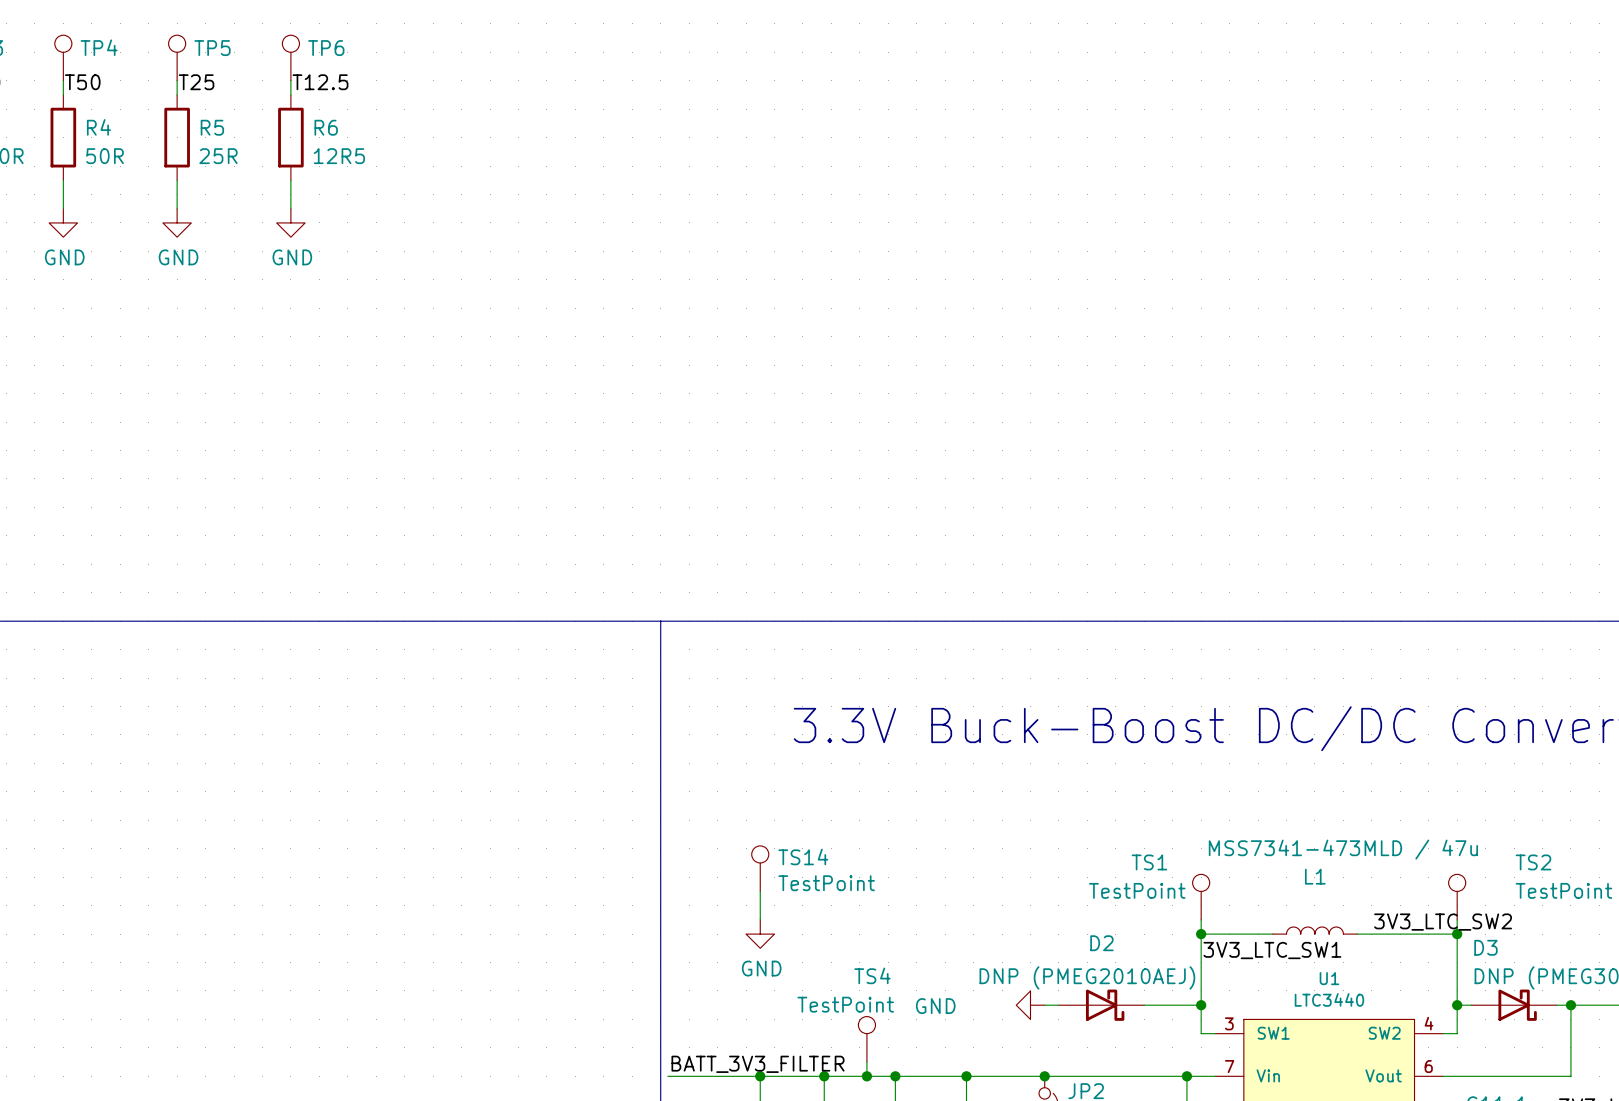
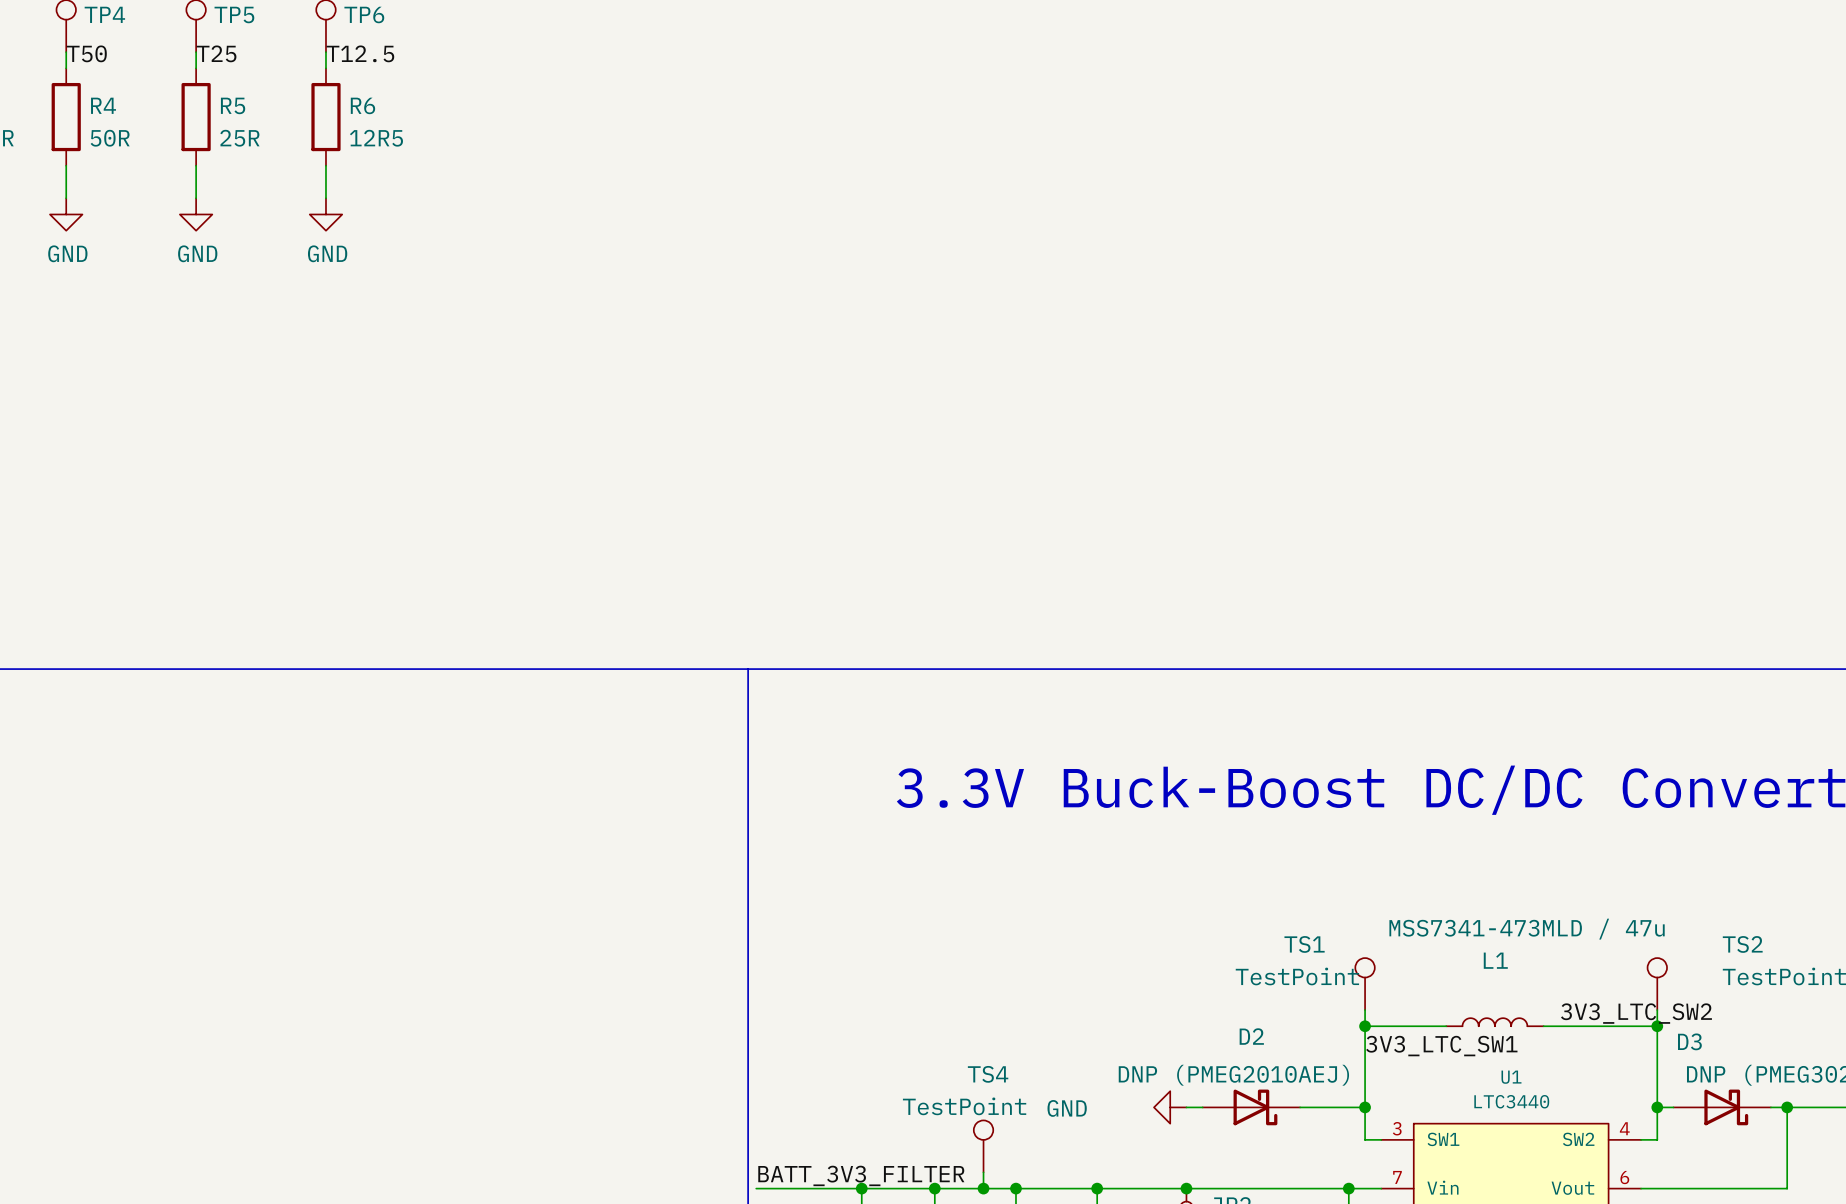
TS14: TestPoint (760, 868) -> none
wire: (760, 891) (760, 919) -> none
power symbol: GND (760, 934) -> none

